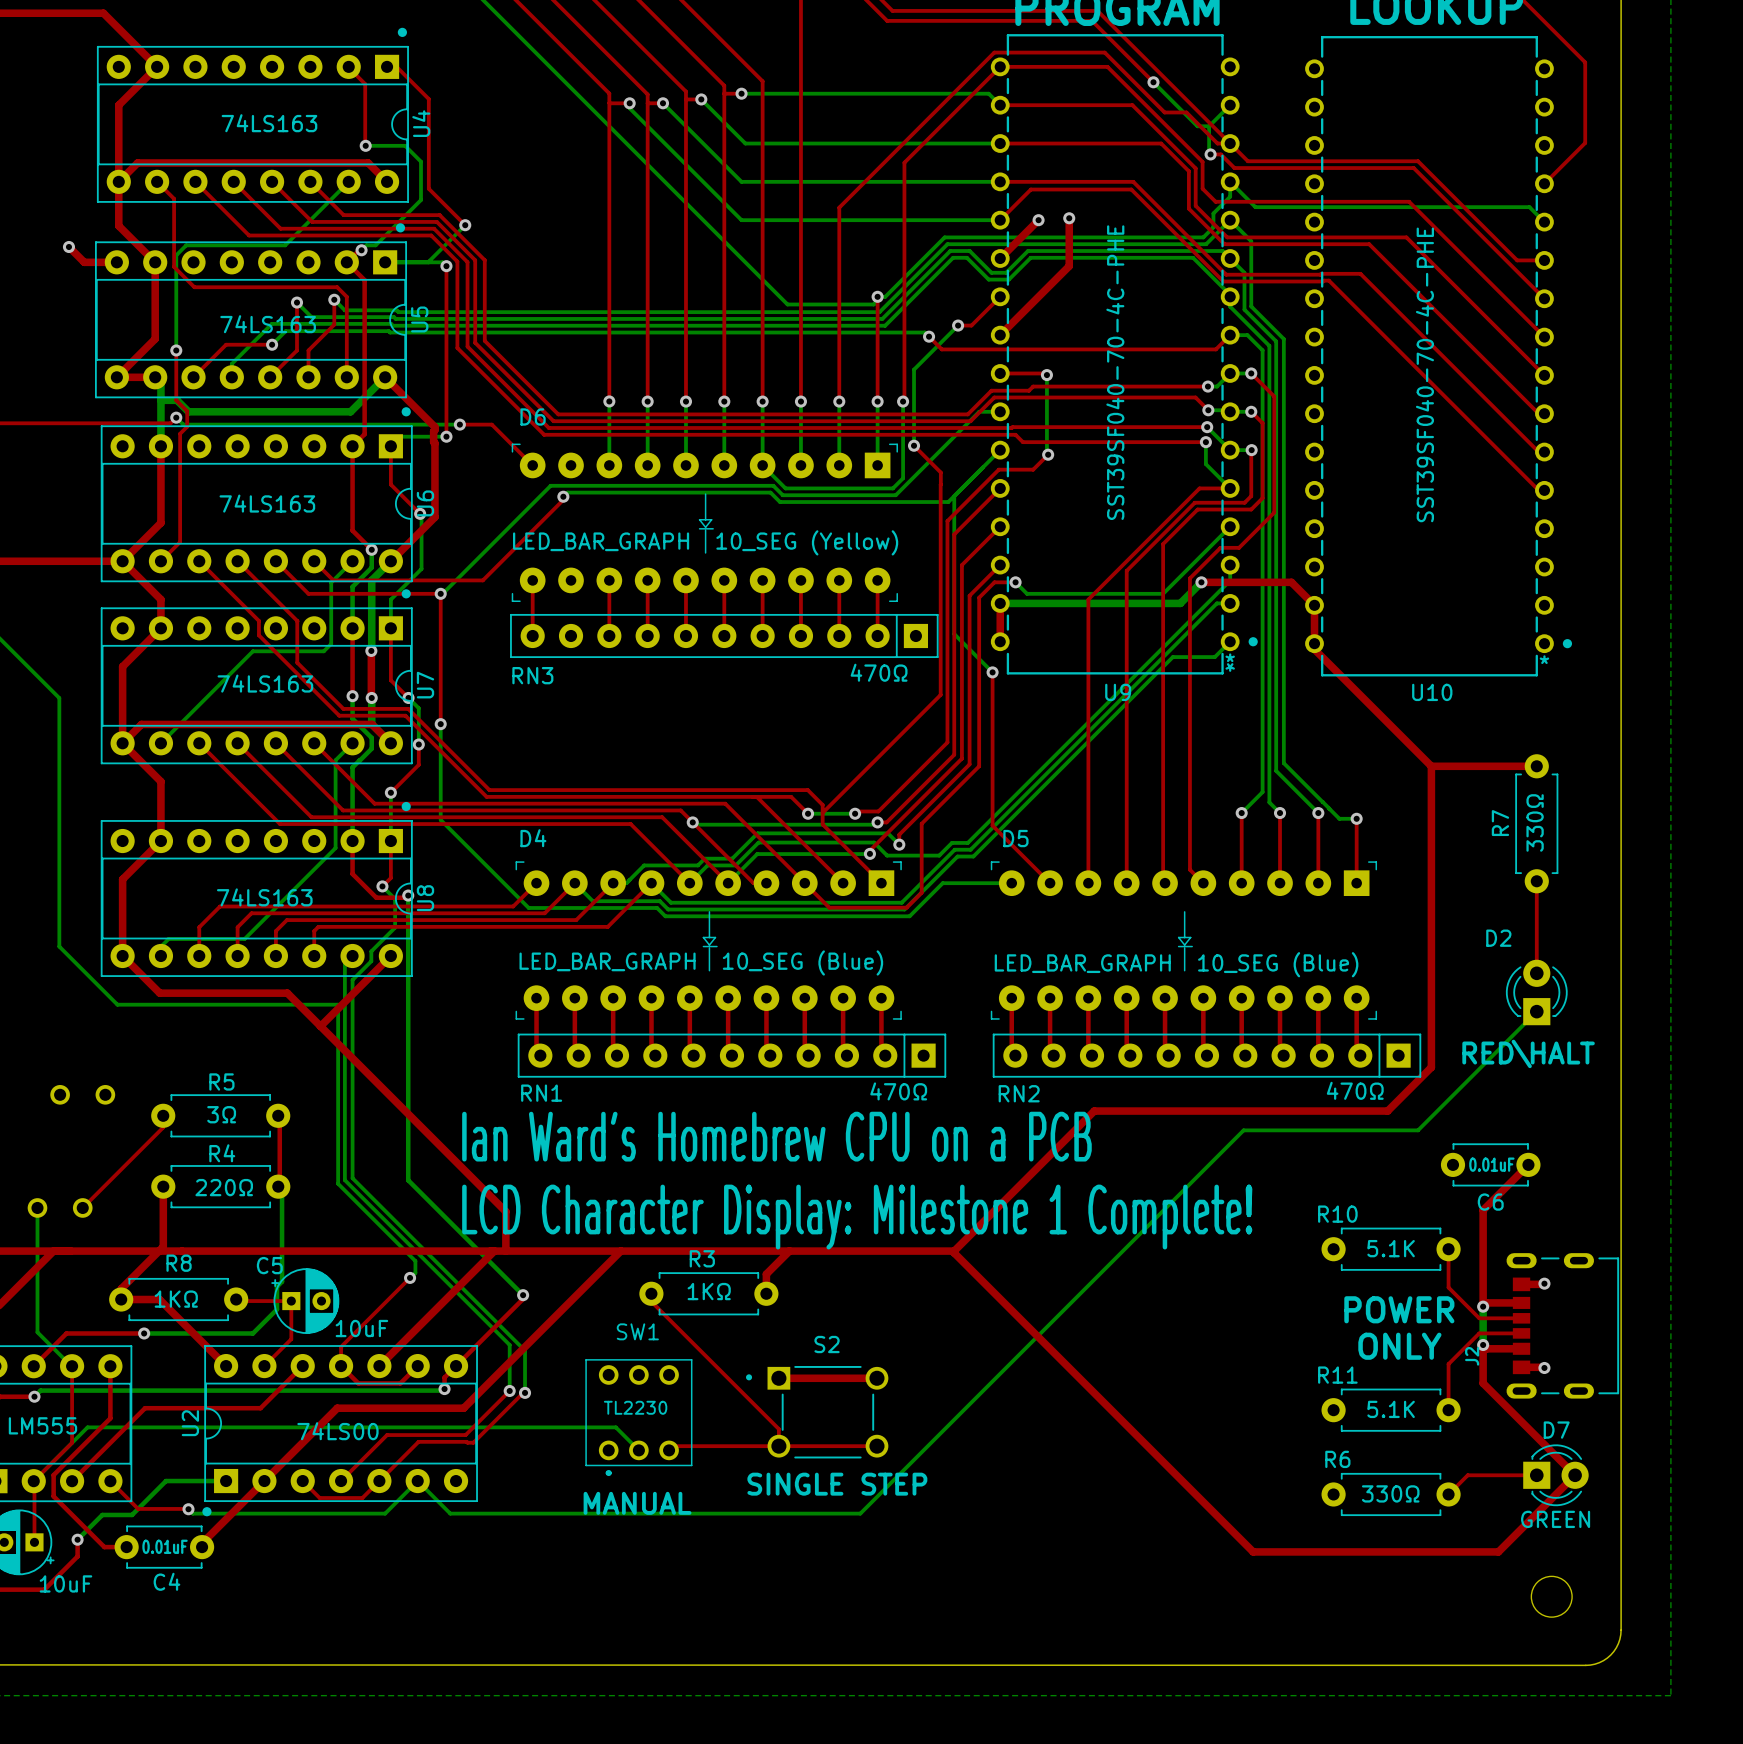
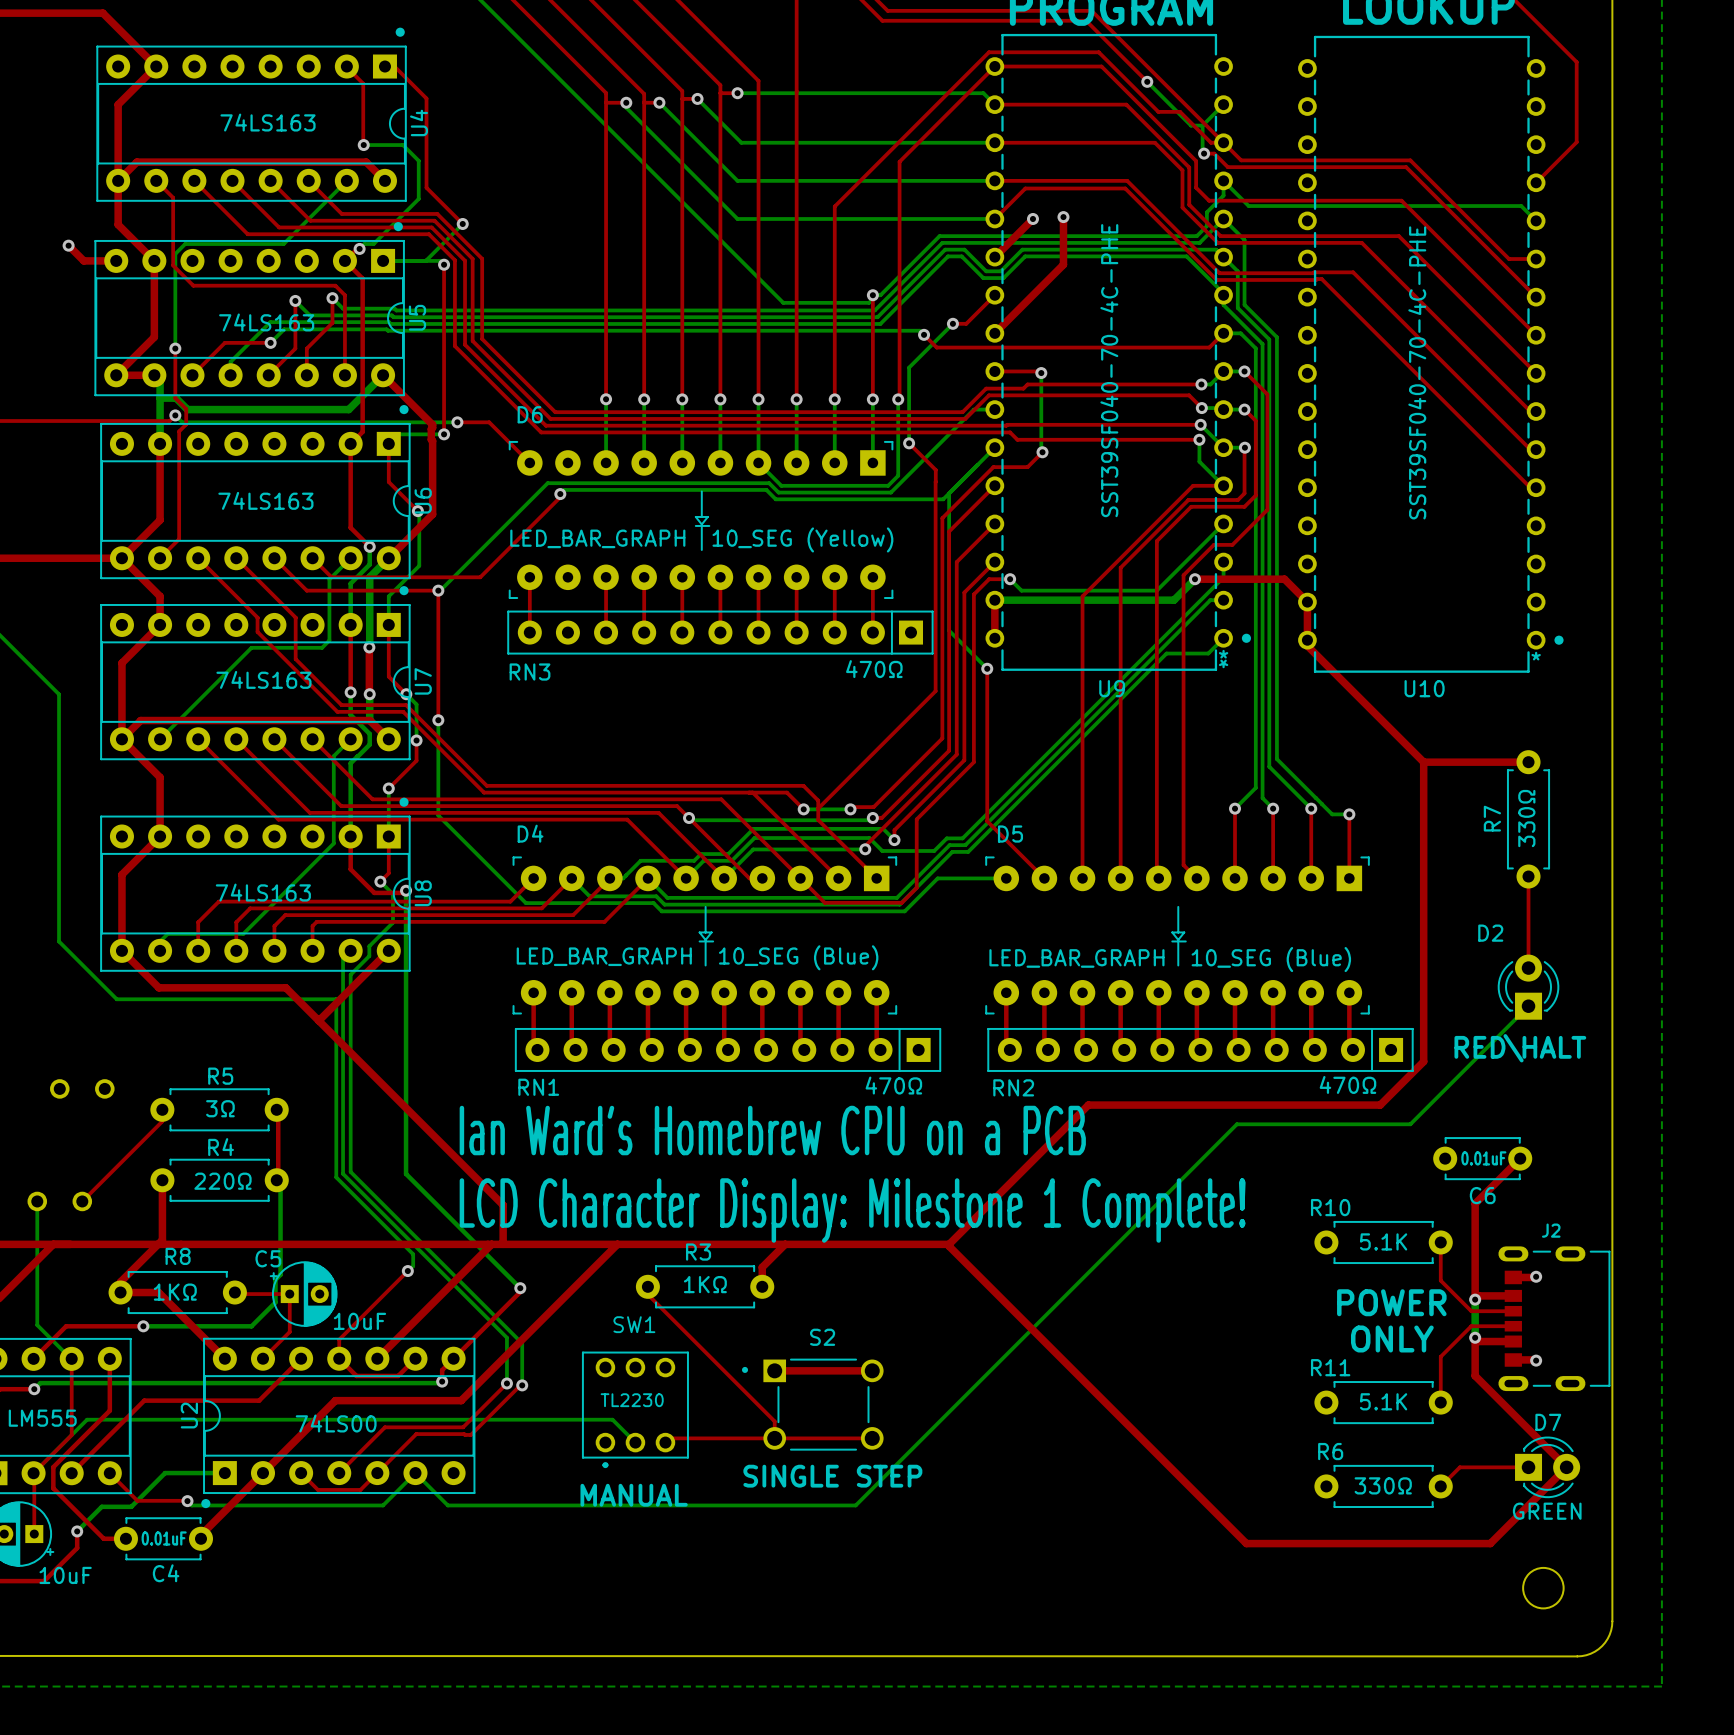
J2 name rotation: 0° (1472, 1356) -> 90° clockwise (1551, 1230)
J2 name position: J2 (1472, 1356) -> J2 (1551, 1230)

